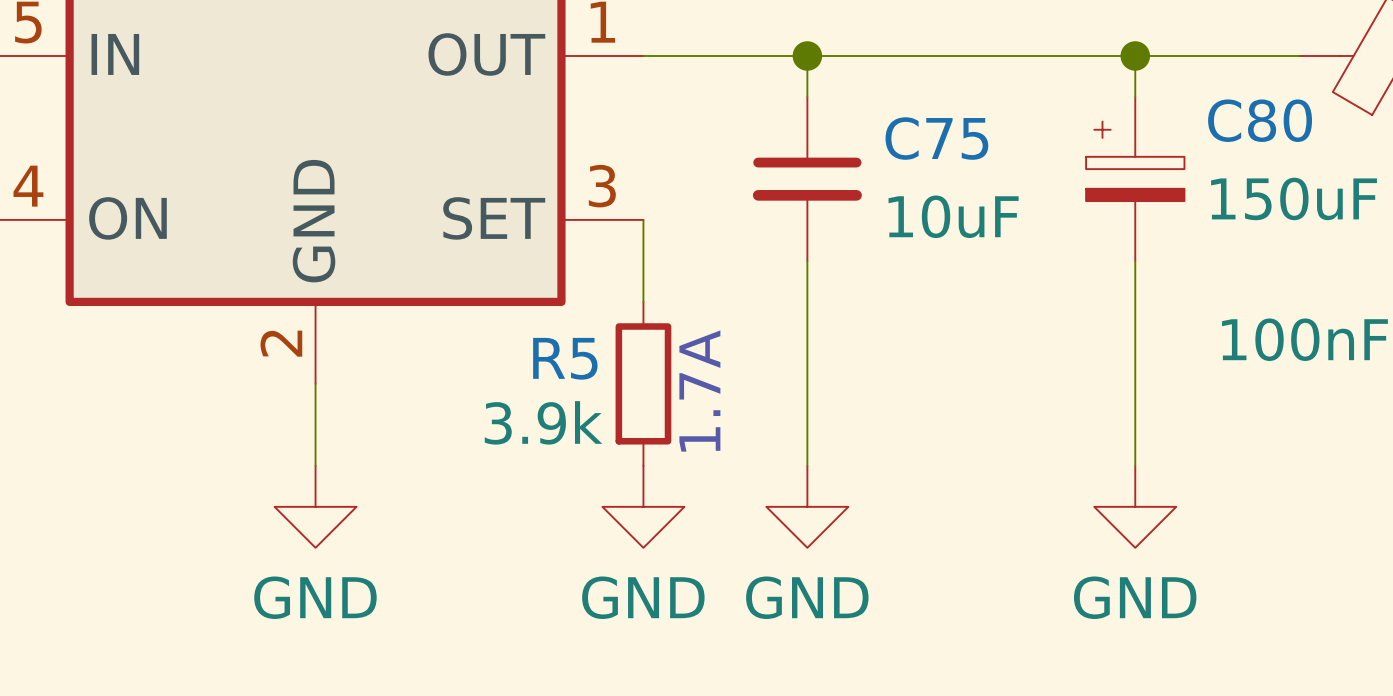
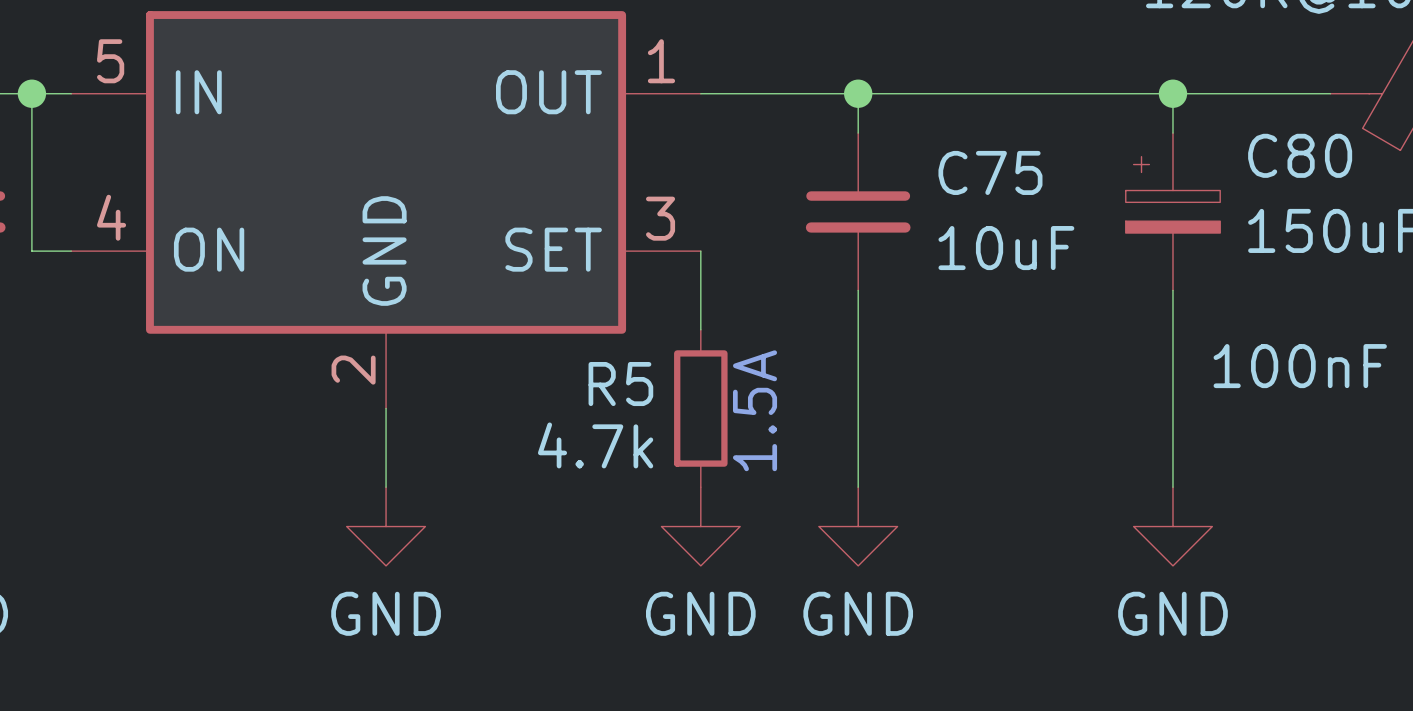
text: 1.7A (699, 391) -> 1.5A (755, 410)
R5 value: 3.9k (543, 422) -> 4.7k (595, 445)

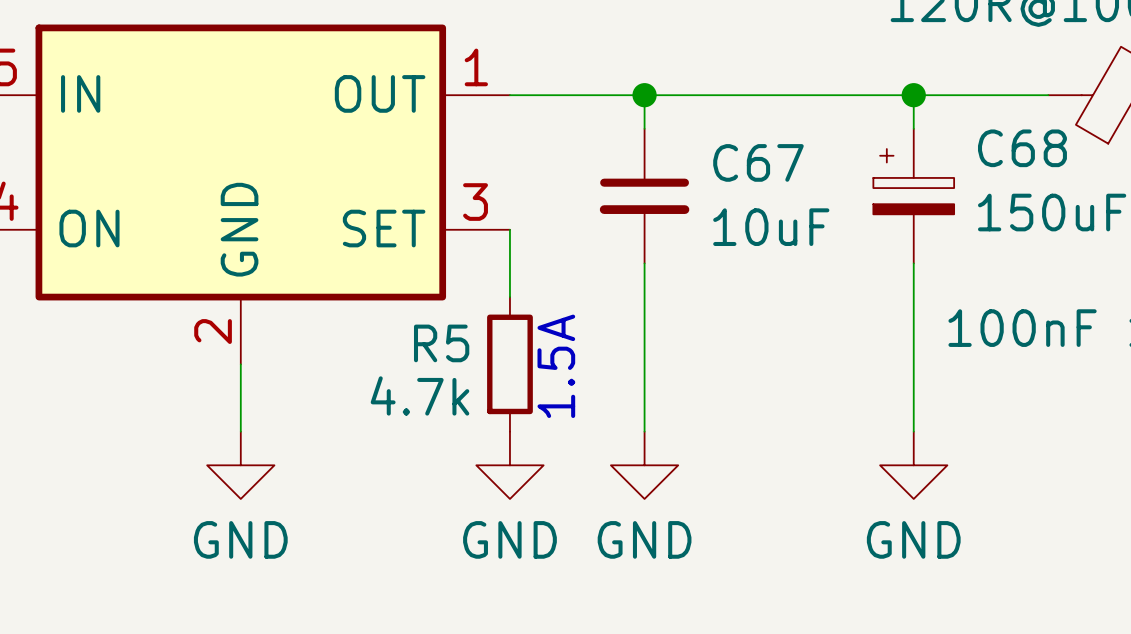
C80 name: C80 (1300, 155) -> C68 (1022, 148)
C75 name: C75 (990, 172) -> C67 (758, 162)

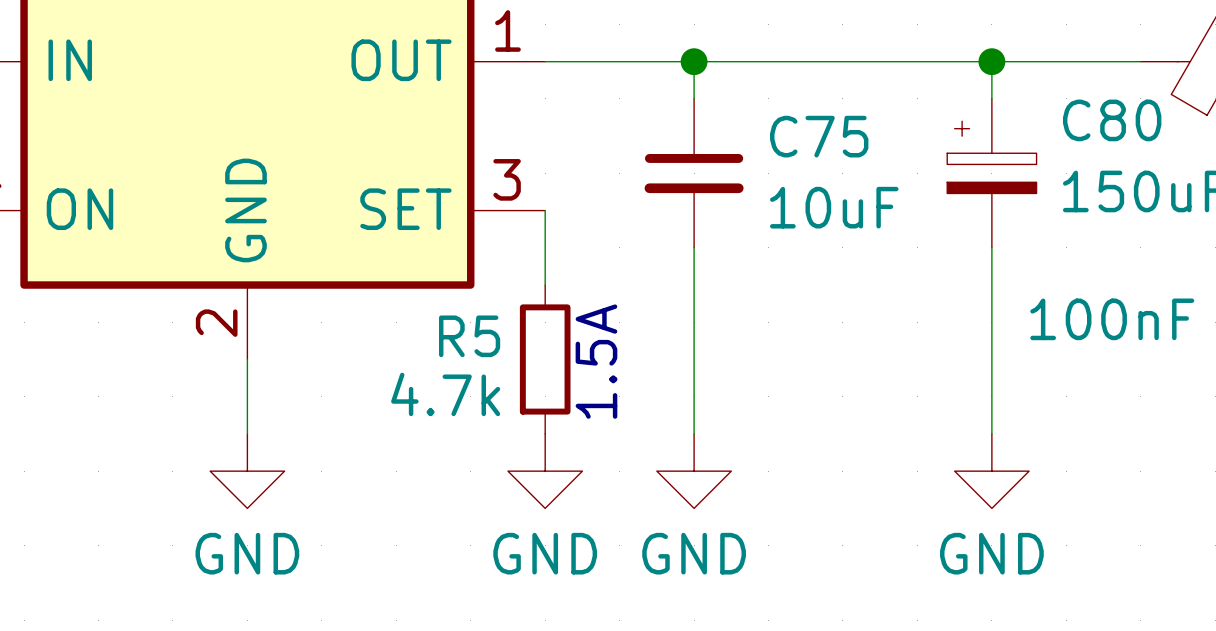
C68 name: C68 (1022, 148) -> C80 (1112, 120)
C67 name: C67 (758, 162) -> C75 (819, 136)

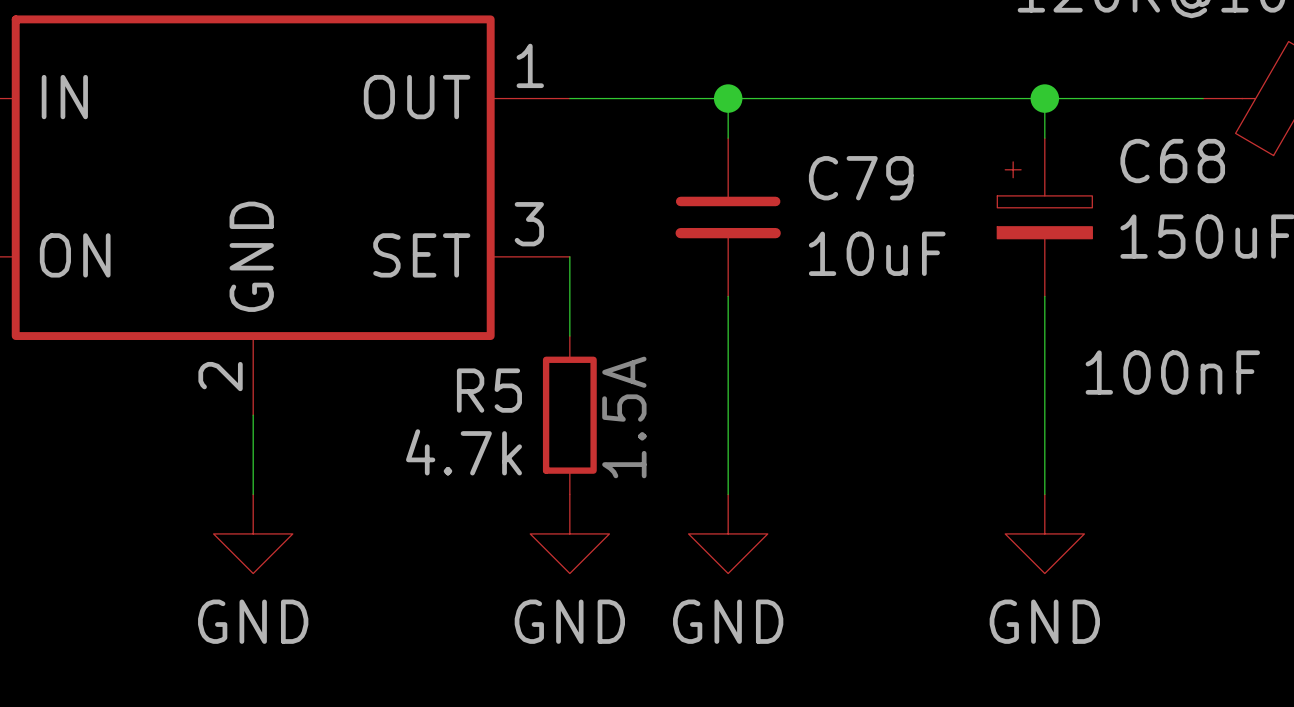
C80 name: C80 (1112, 120) -> C68 (1172, 161)
C75 name: C75 (819, 136) -> C79 (861, 178)

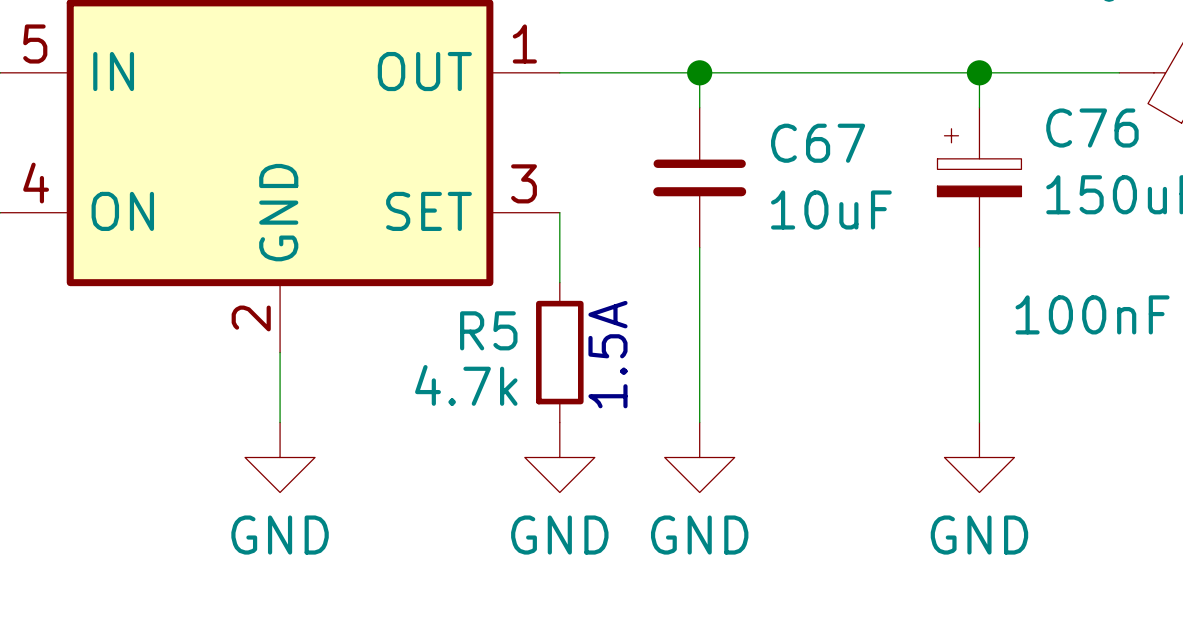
C68 name: C68 (1172, 161) -> C76 (1092, 128)
C79 name: C79 (861, 178) -> C67 (818, 143)

